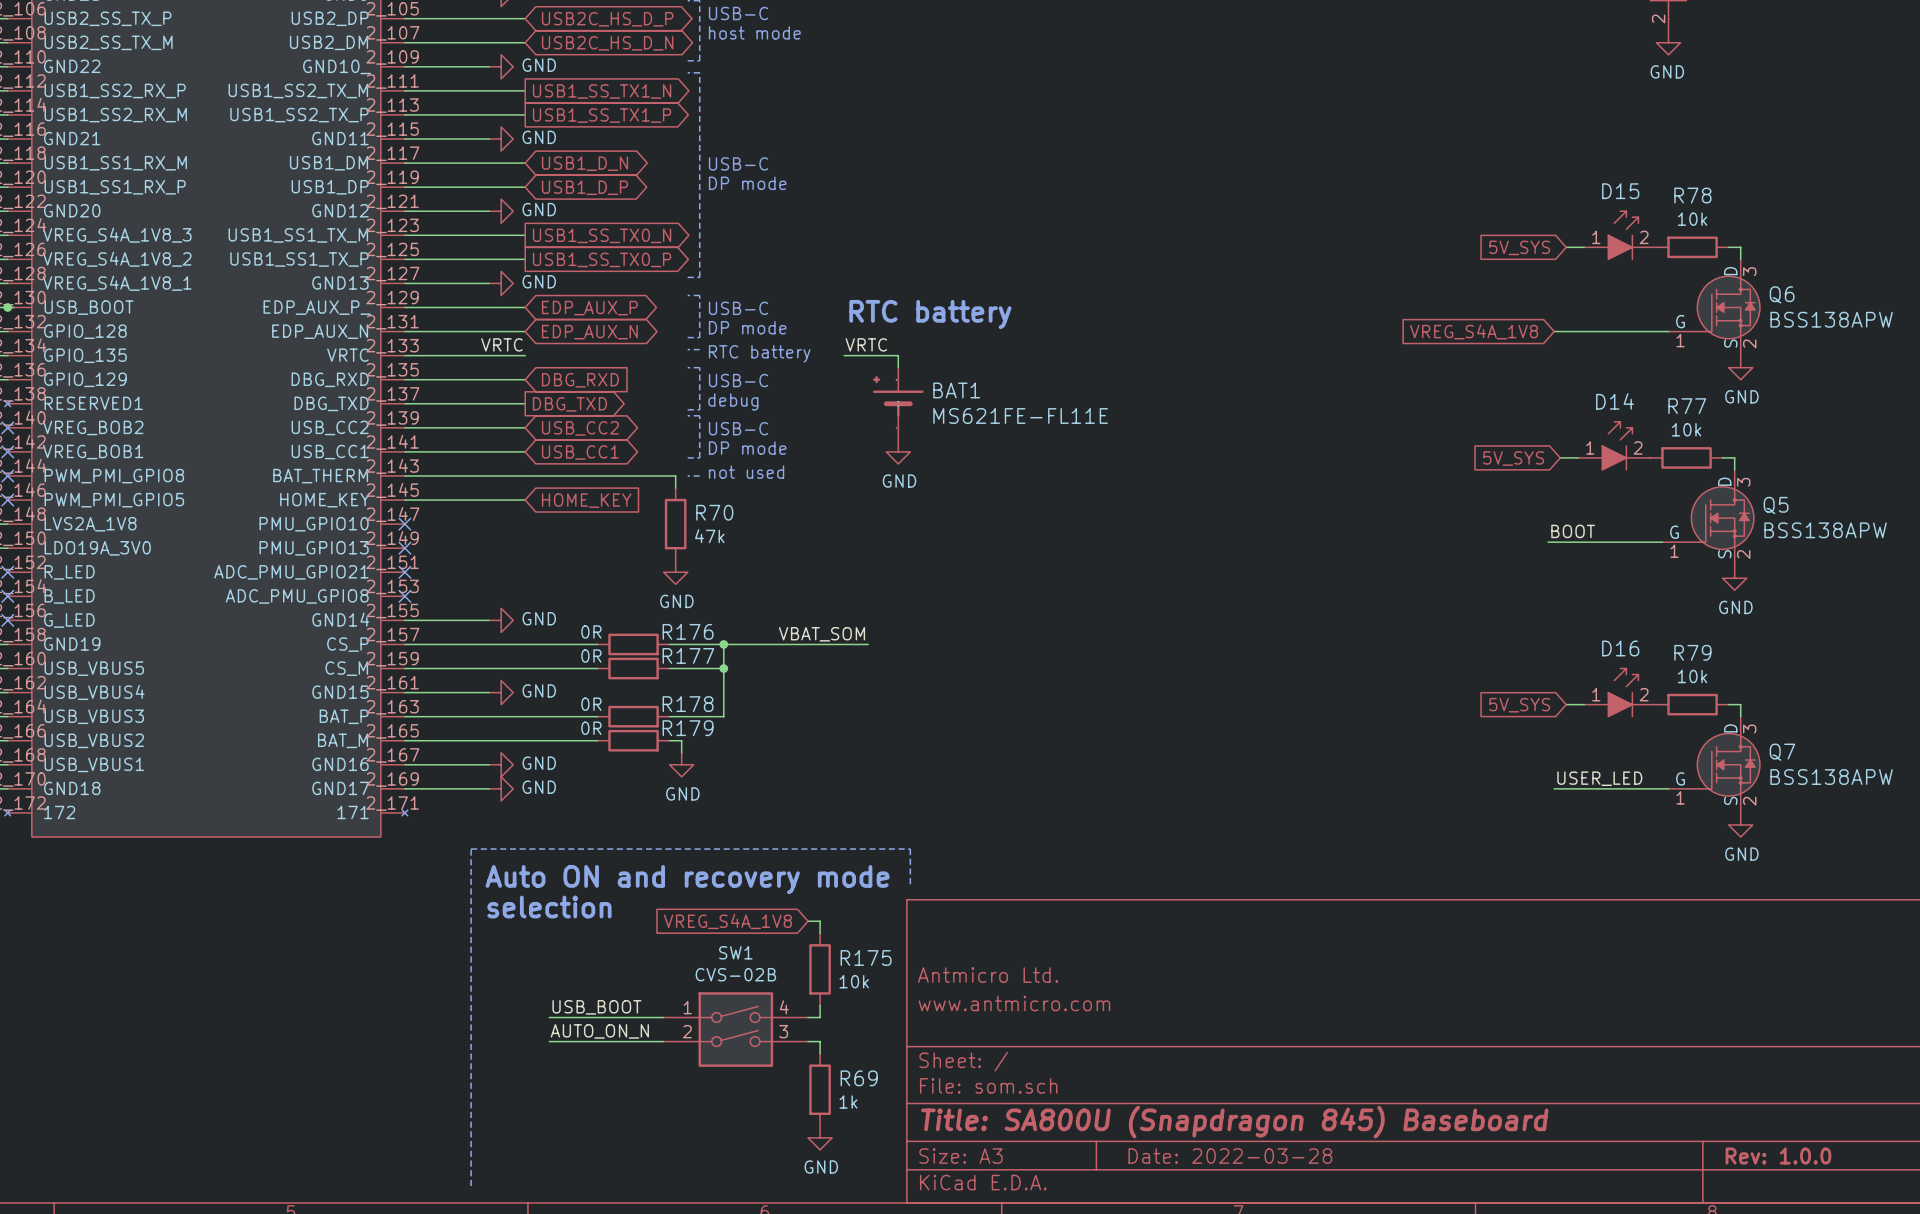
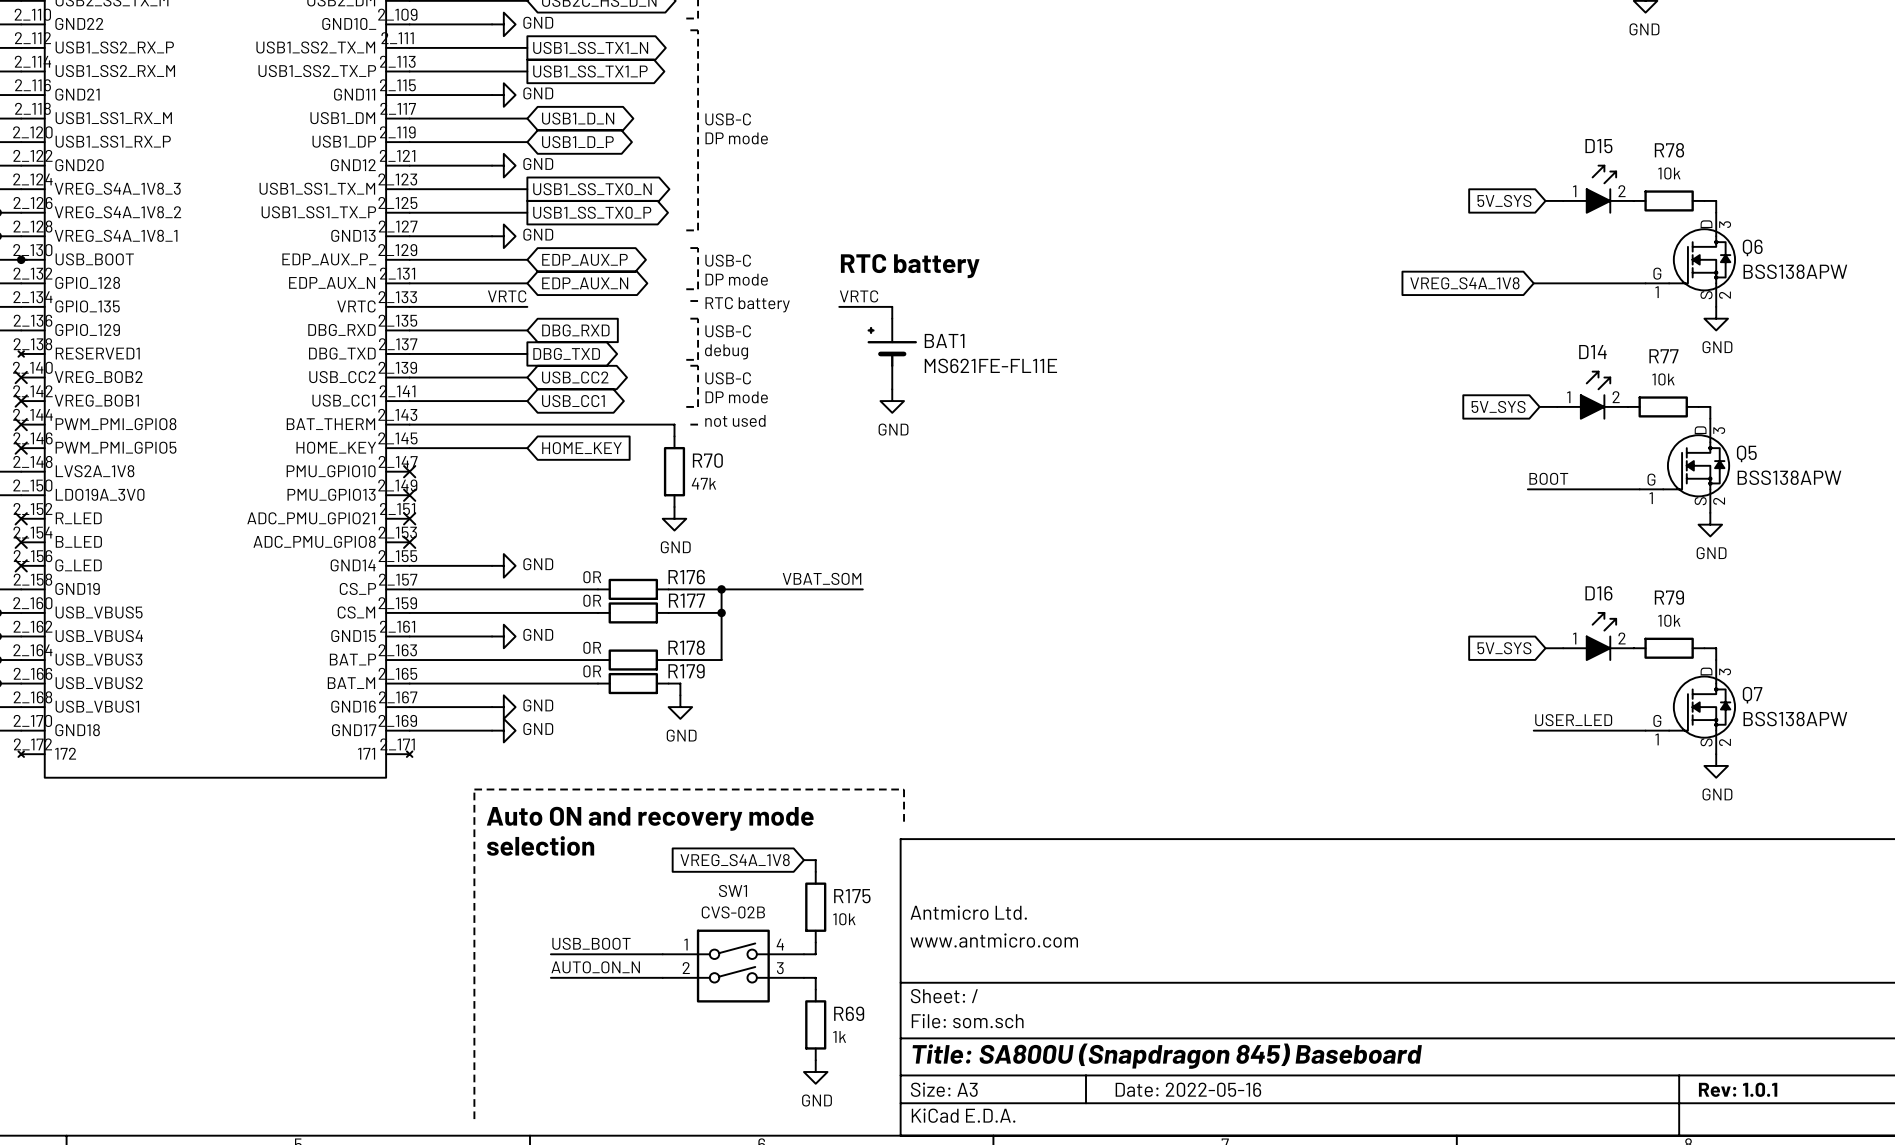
title block: Date: 2022-03-28 (1230, 1156) -> Date: 2022-05-16 (1188, 1089)
title block: Rev: 1.0.0 (1778, 1156) -> Rev: 1.0.1 (1738, 1089)

